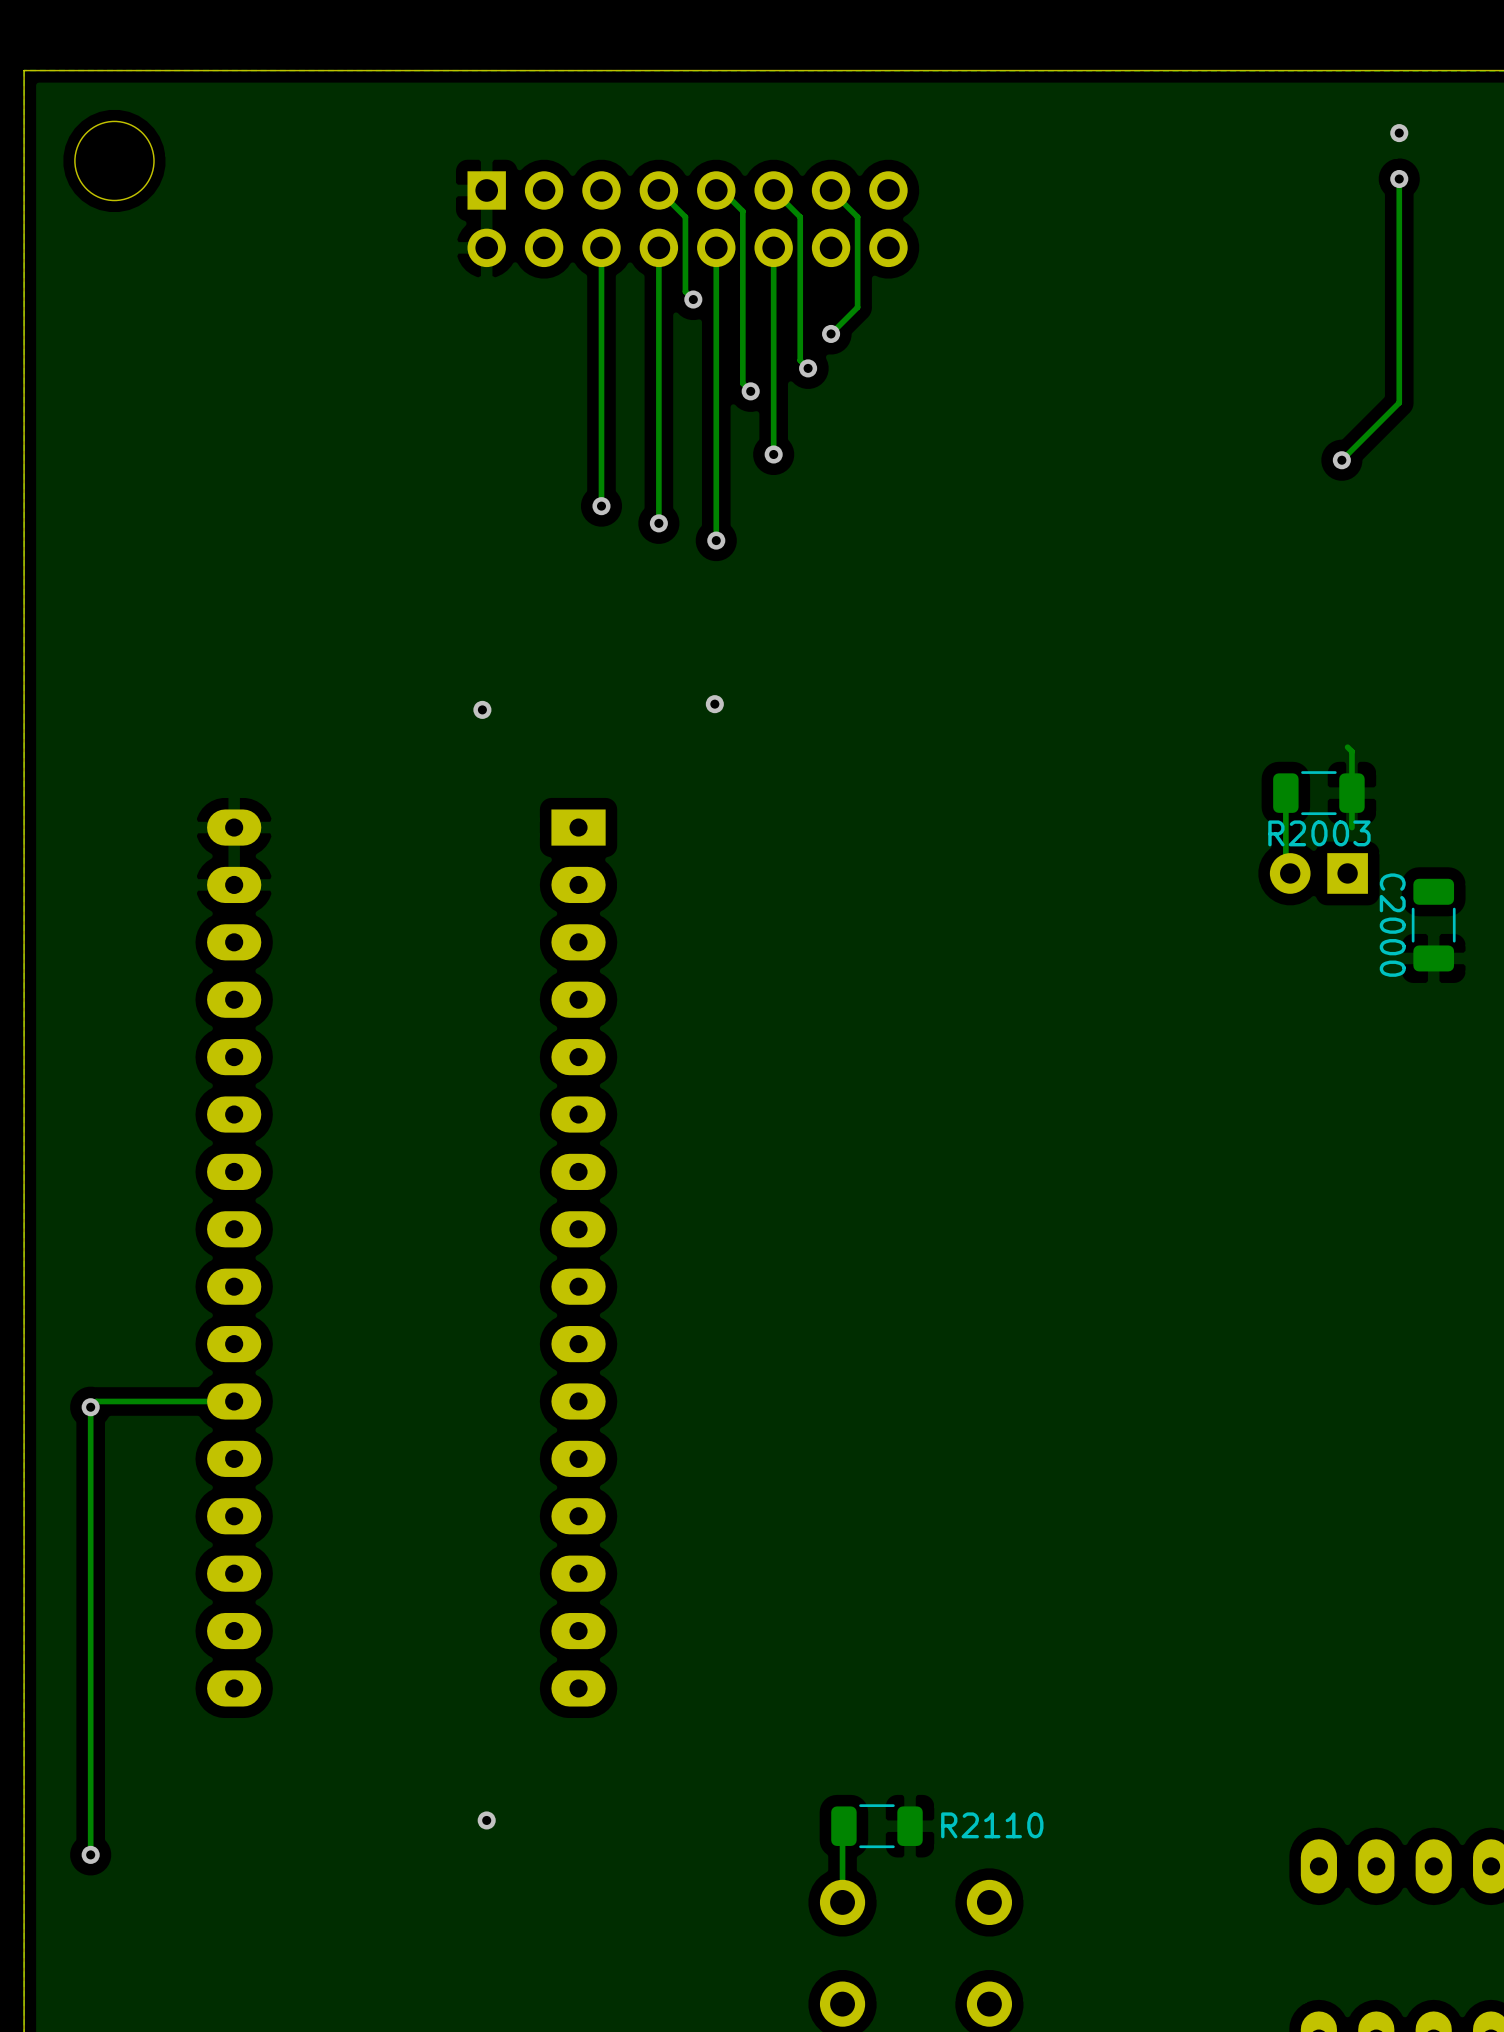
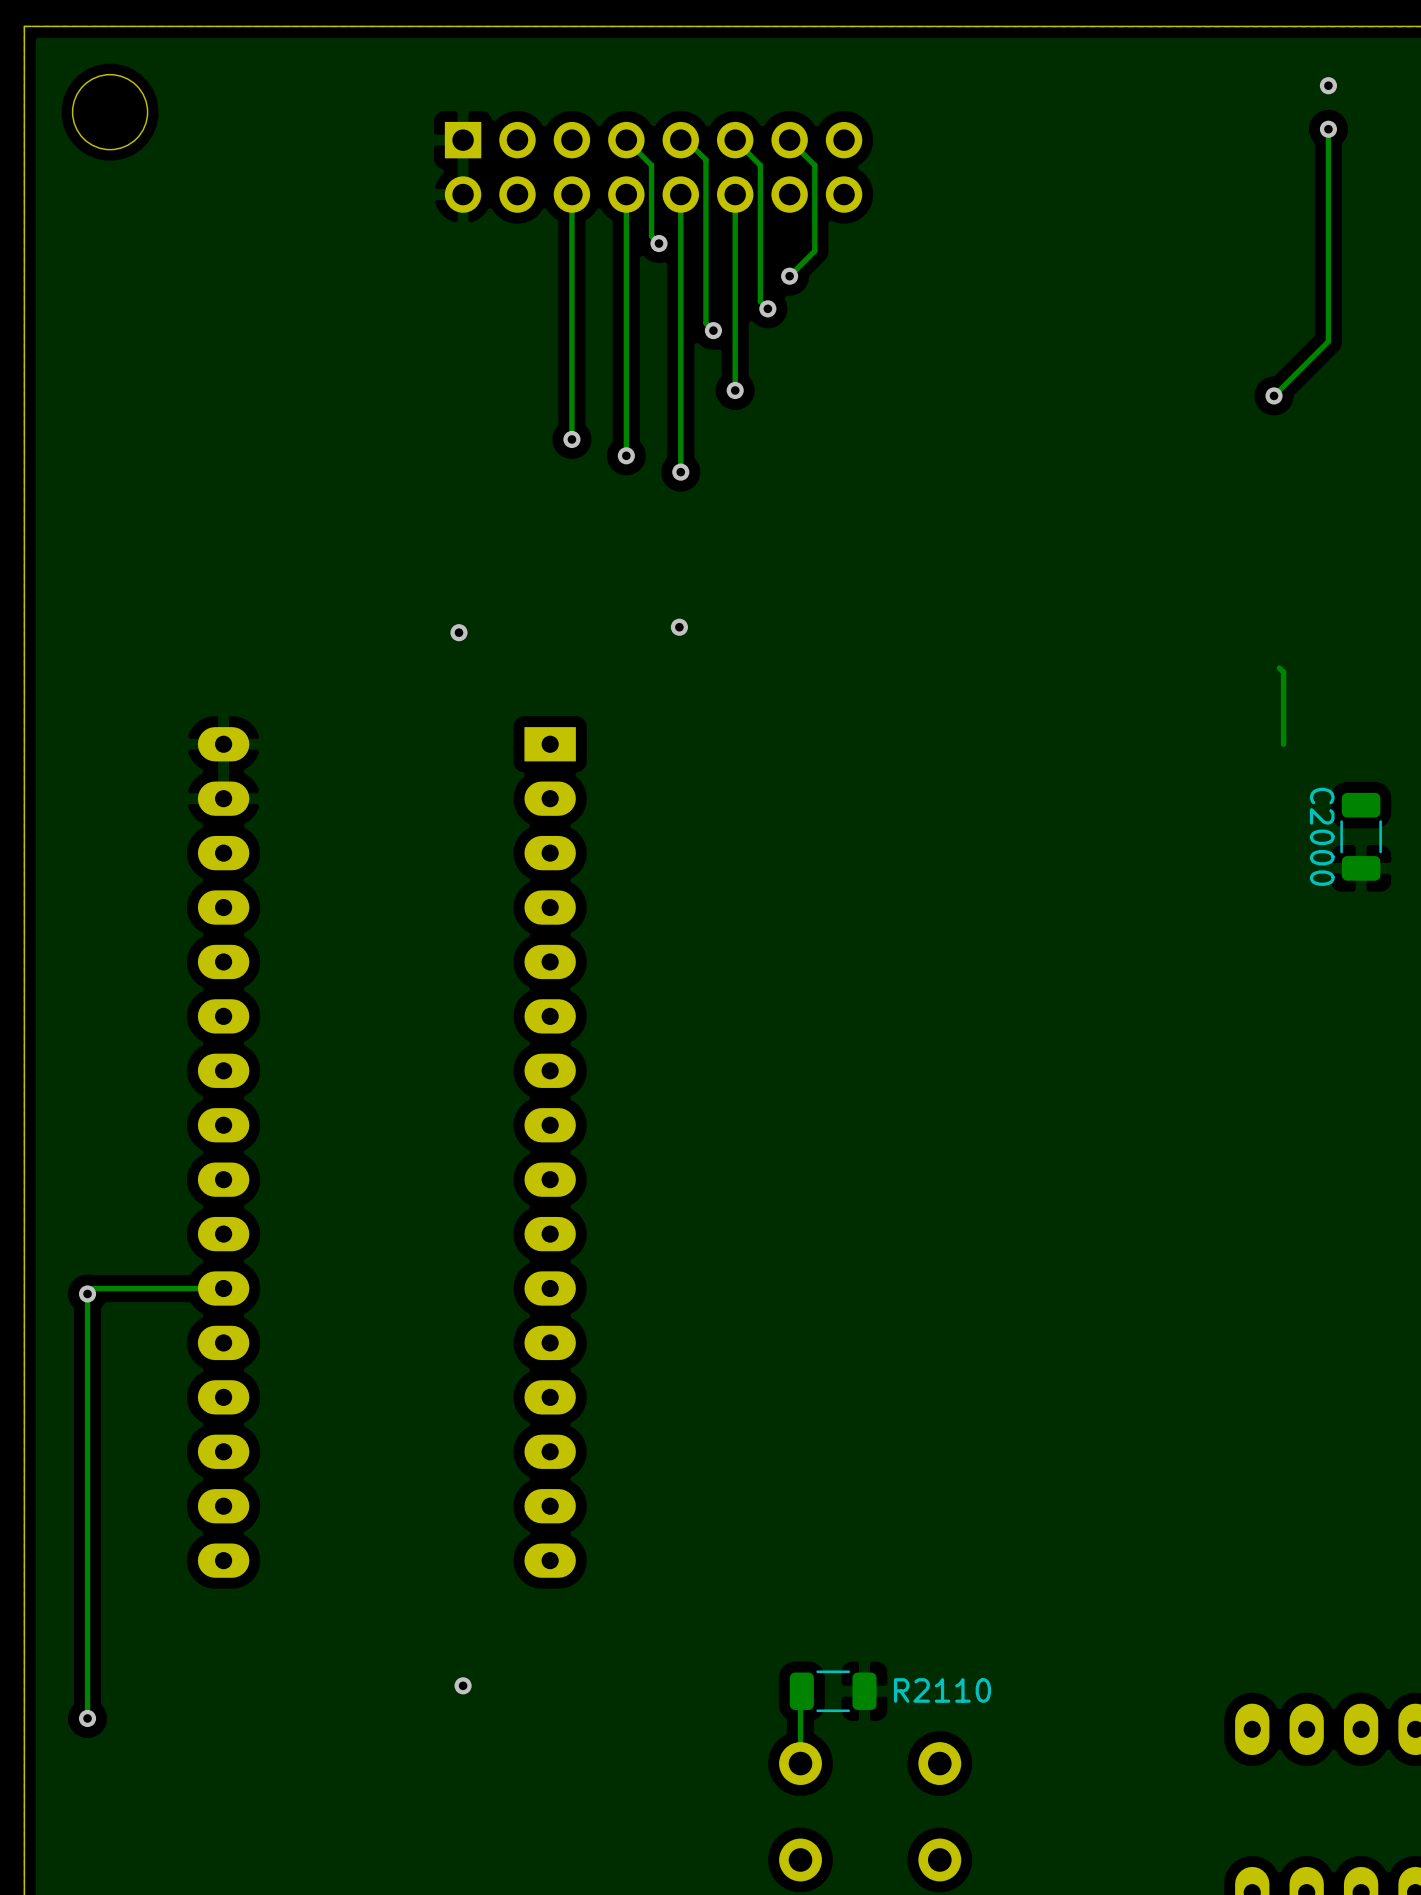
track: (1285, 793) (1285, 869) (1290, 873) -> none
R2003: (1318, 793) -> none
part: (1318, 873) -> none

